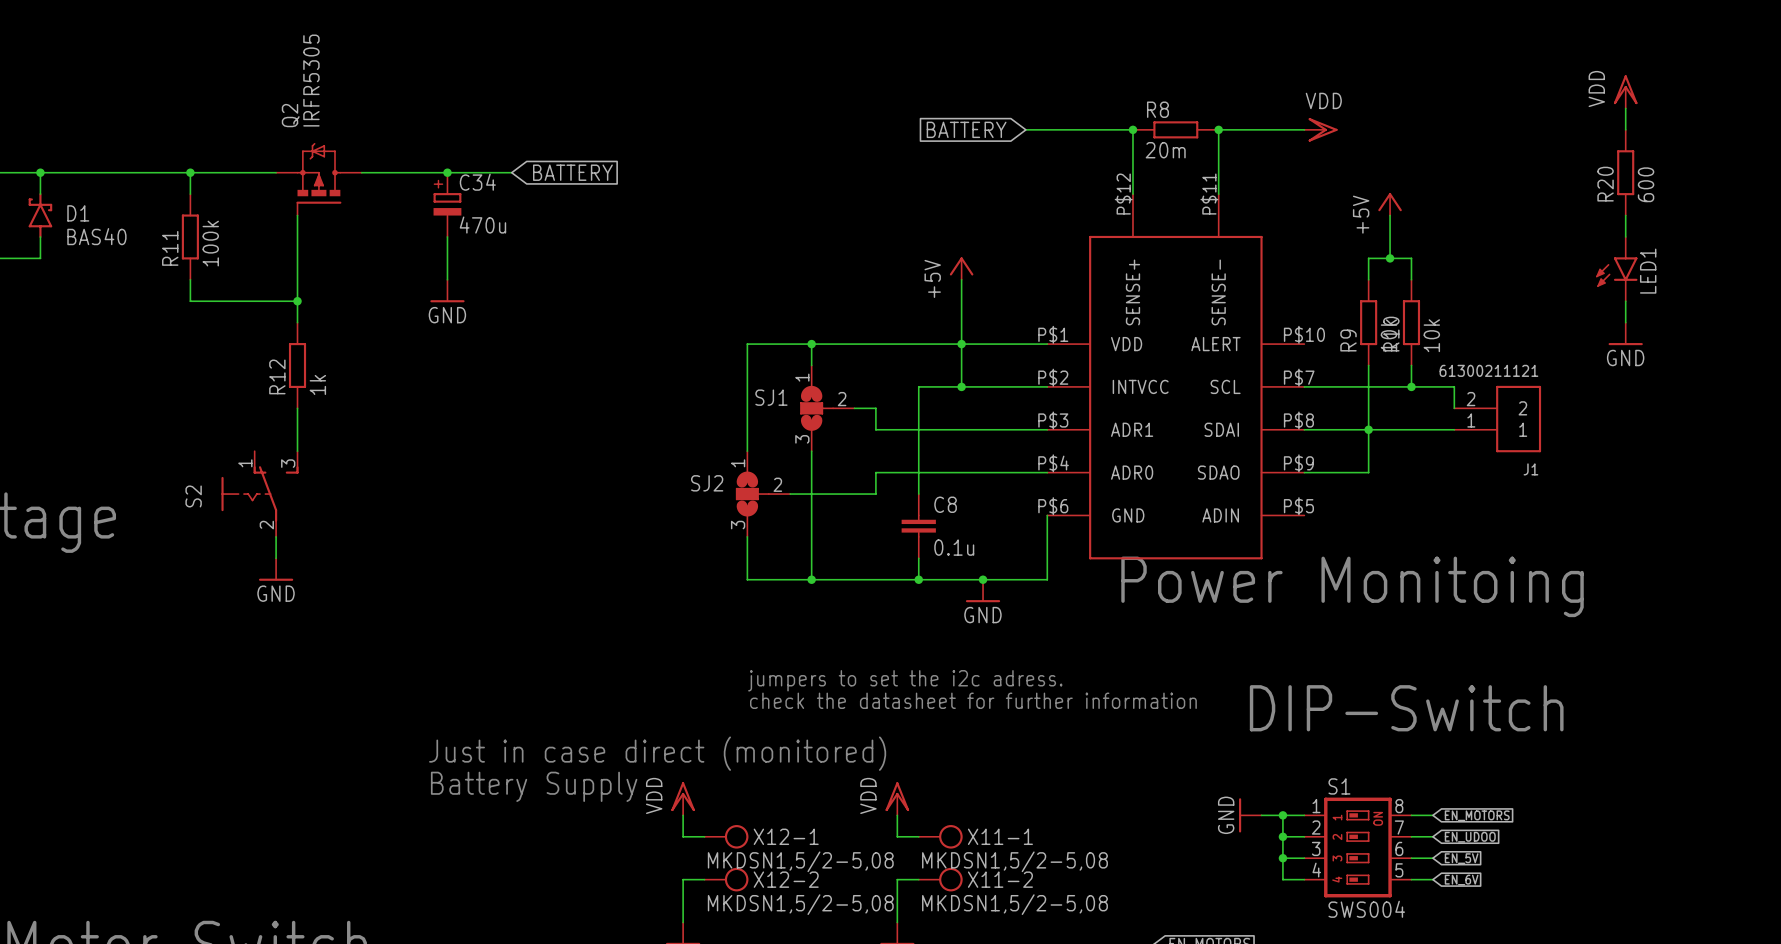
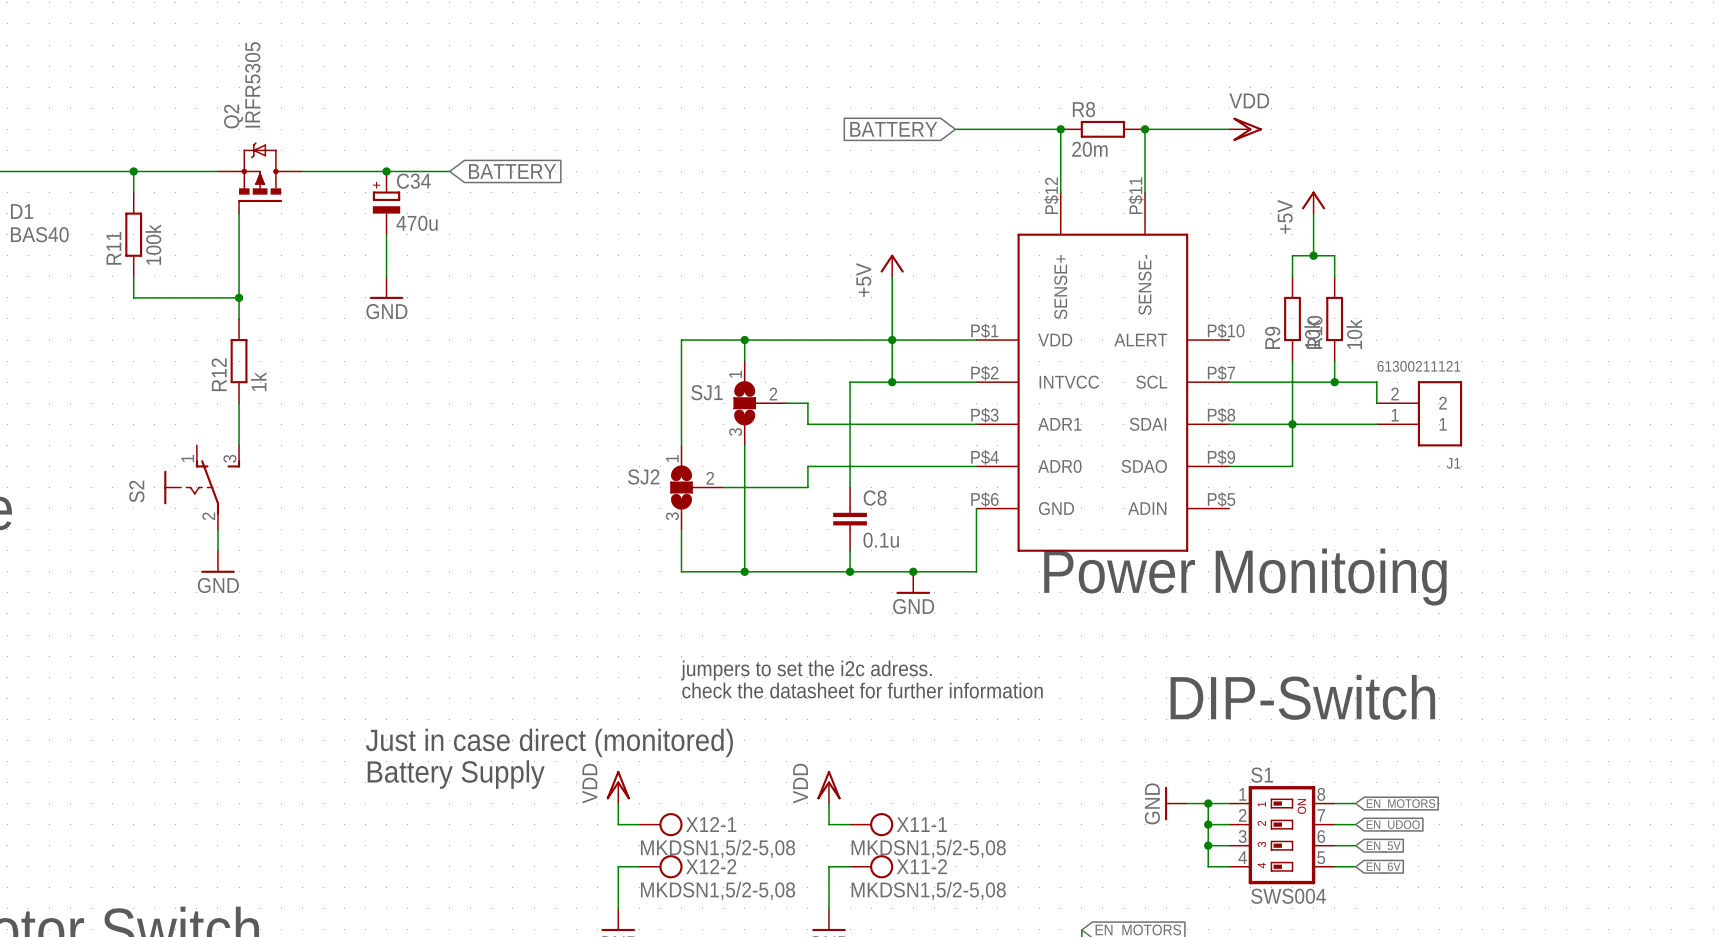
power symbol: VDD (1625, 91) -> none
wire: (1625, 108) (1625, 129) -> none
R20: 600 (1625, 172) -> none
wire: (1625, 215) (1625, 236) -> none
LED1: (1616, 269) -> none
wire: (1625, 301) (1625, 322) -> none
power symbol: GND (1625, 333) -> none

